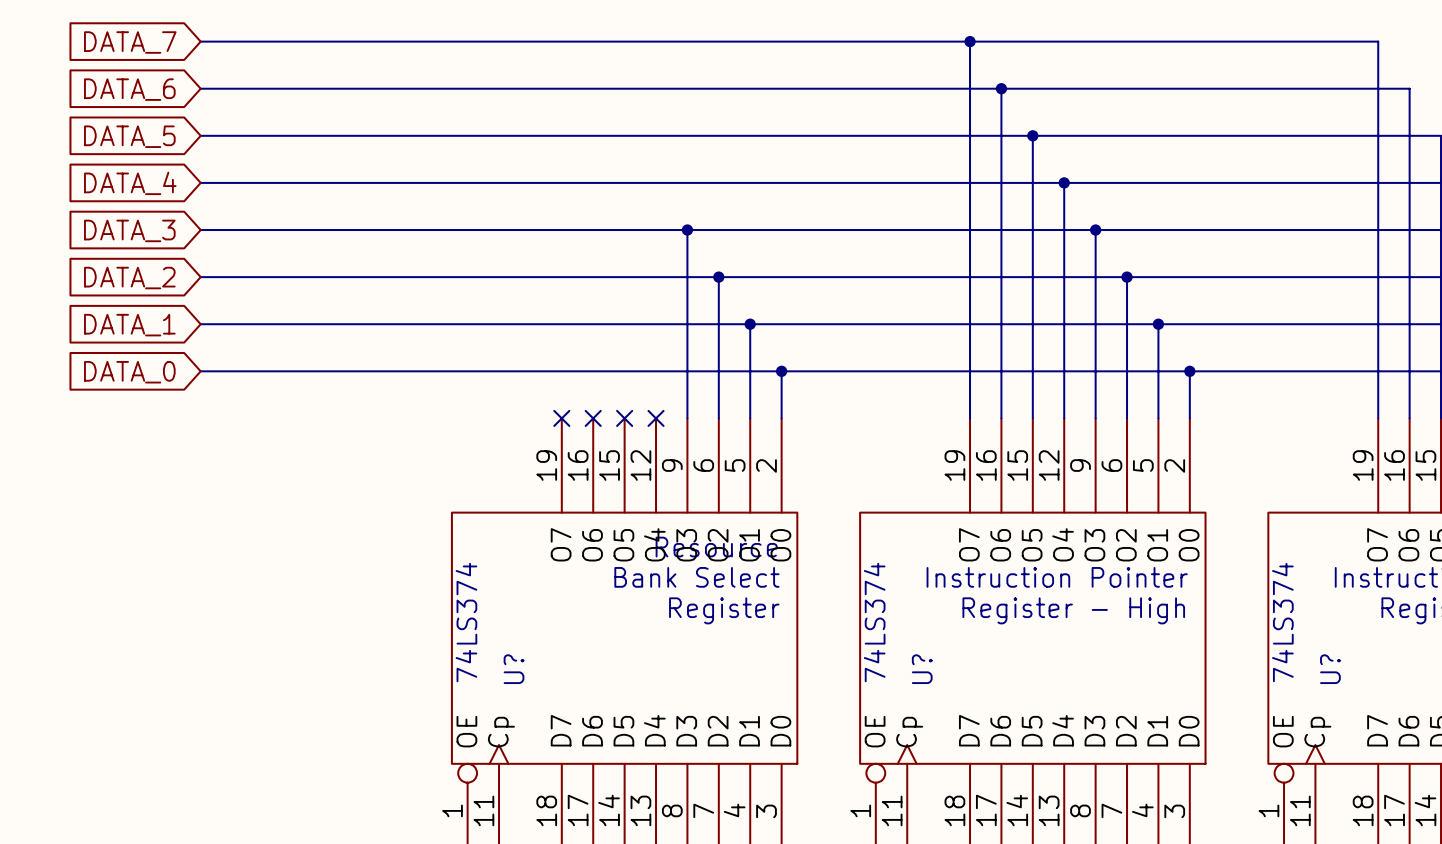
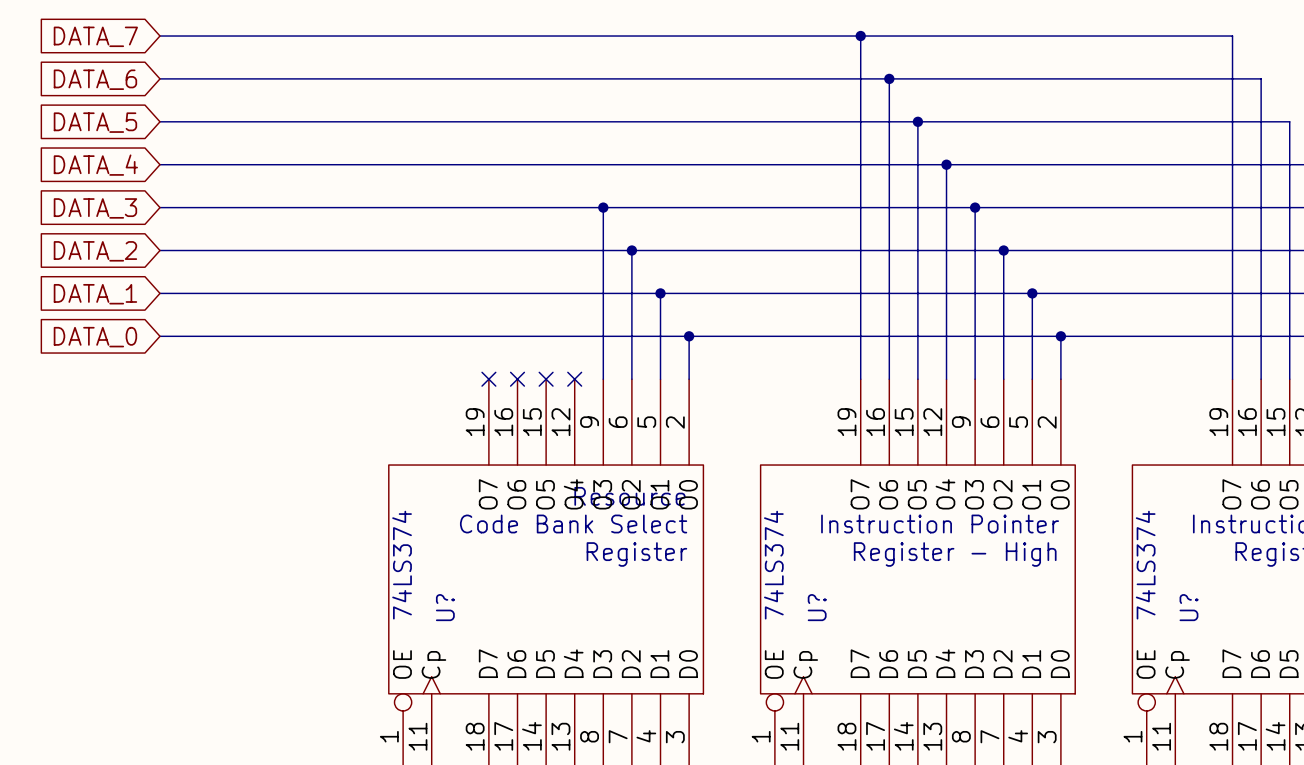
text: Bank Select (696, 577) -> Code Bank Select (573, 523)

